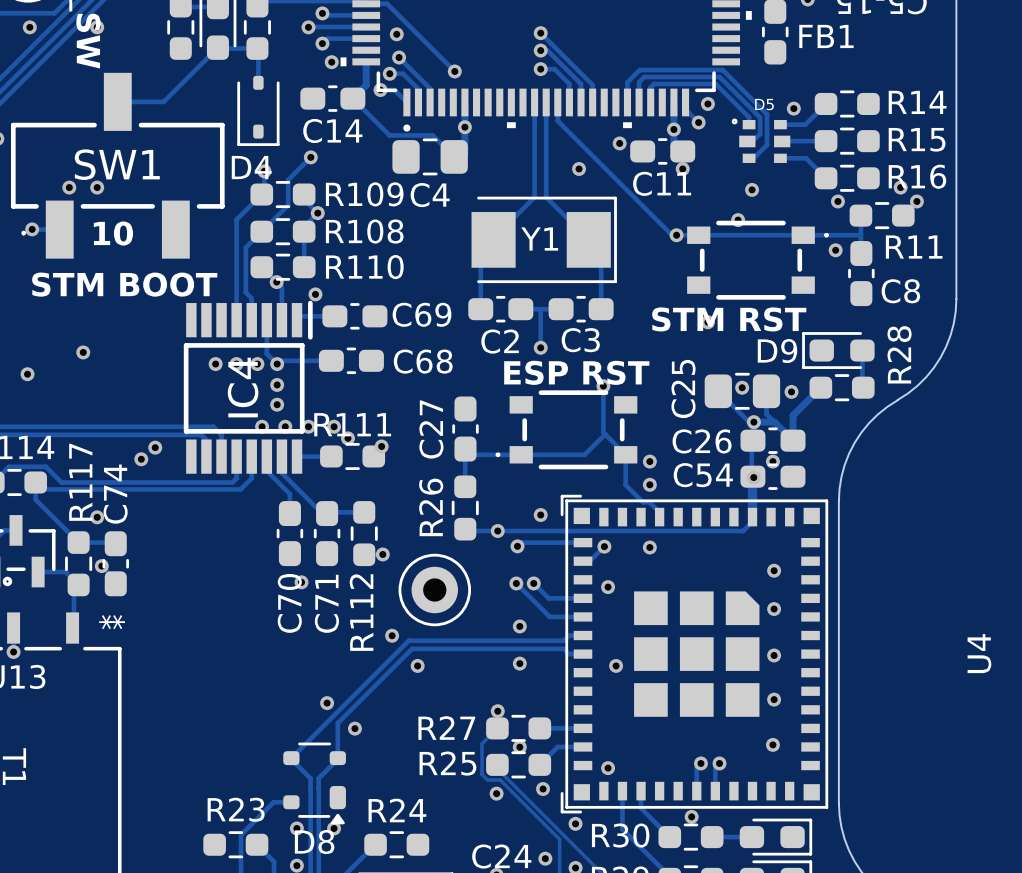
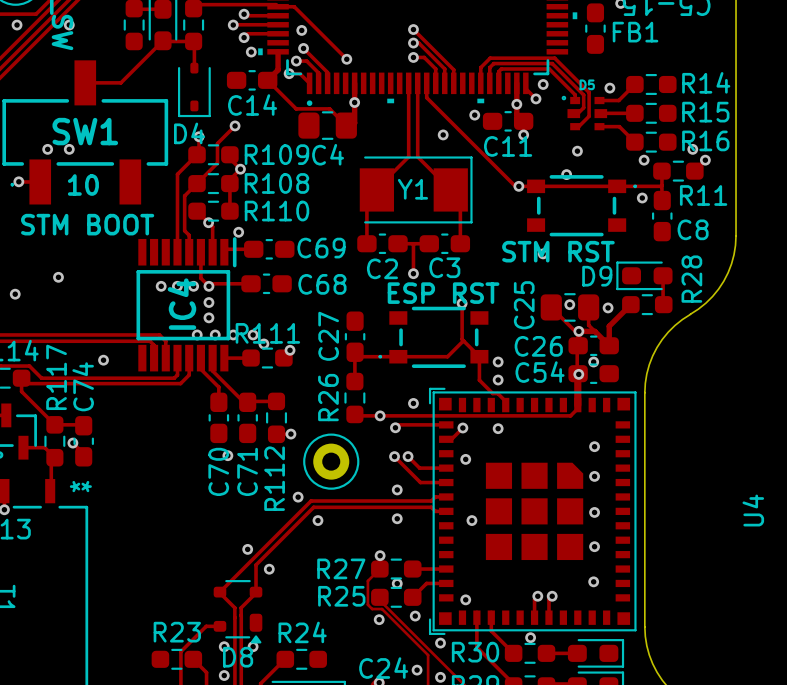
via: (155, 447) -> none
via: (97, 517) -> none

